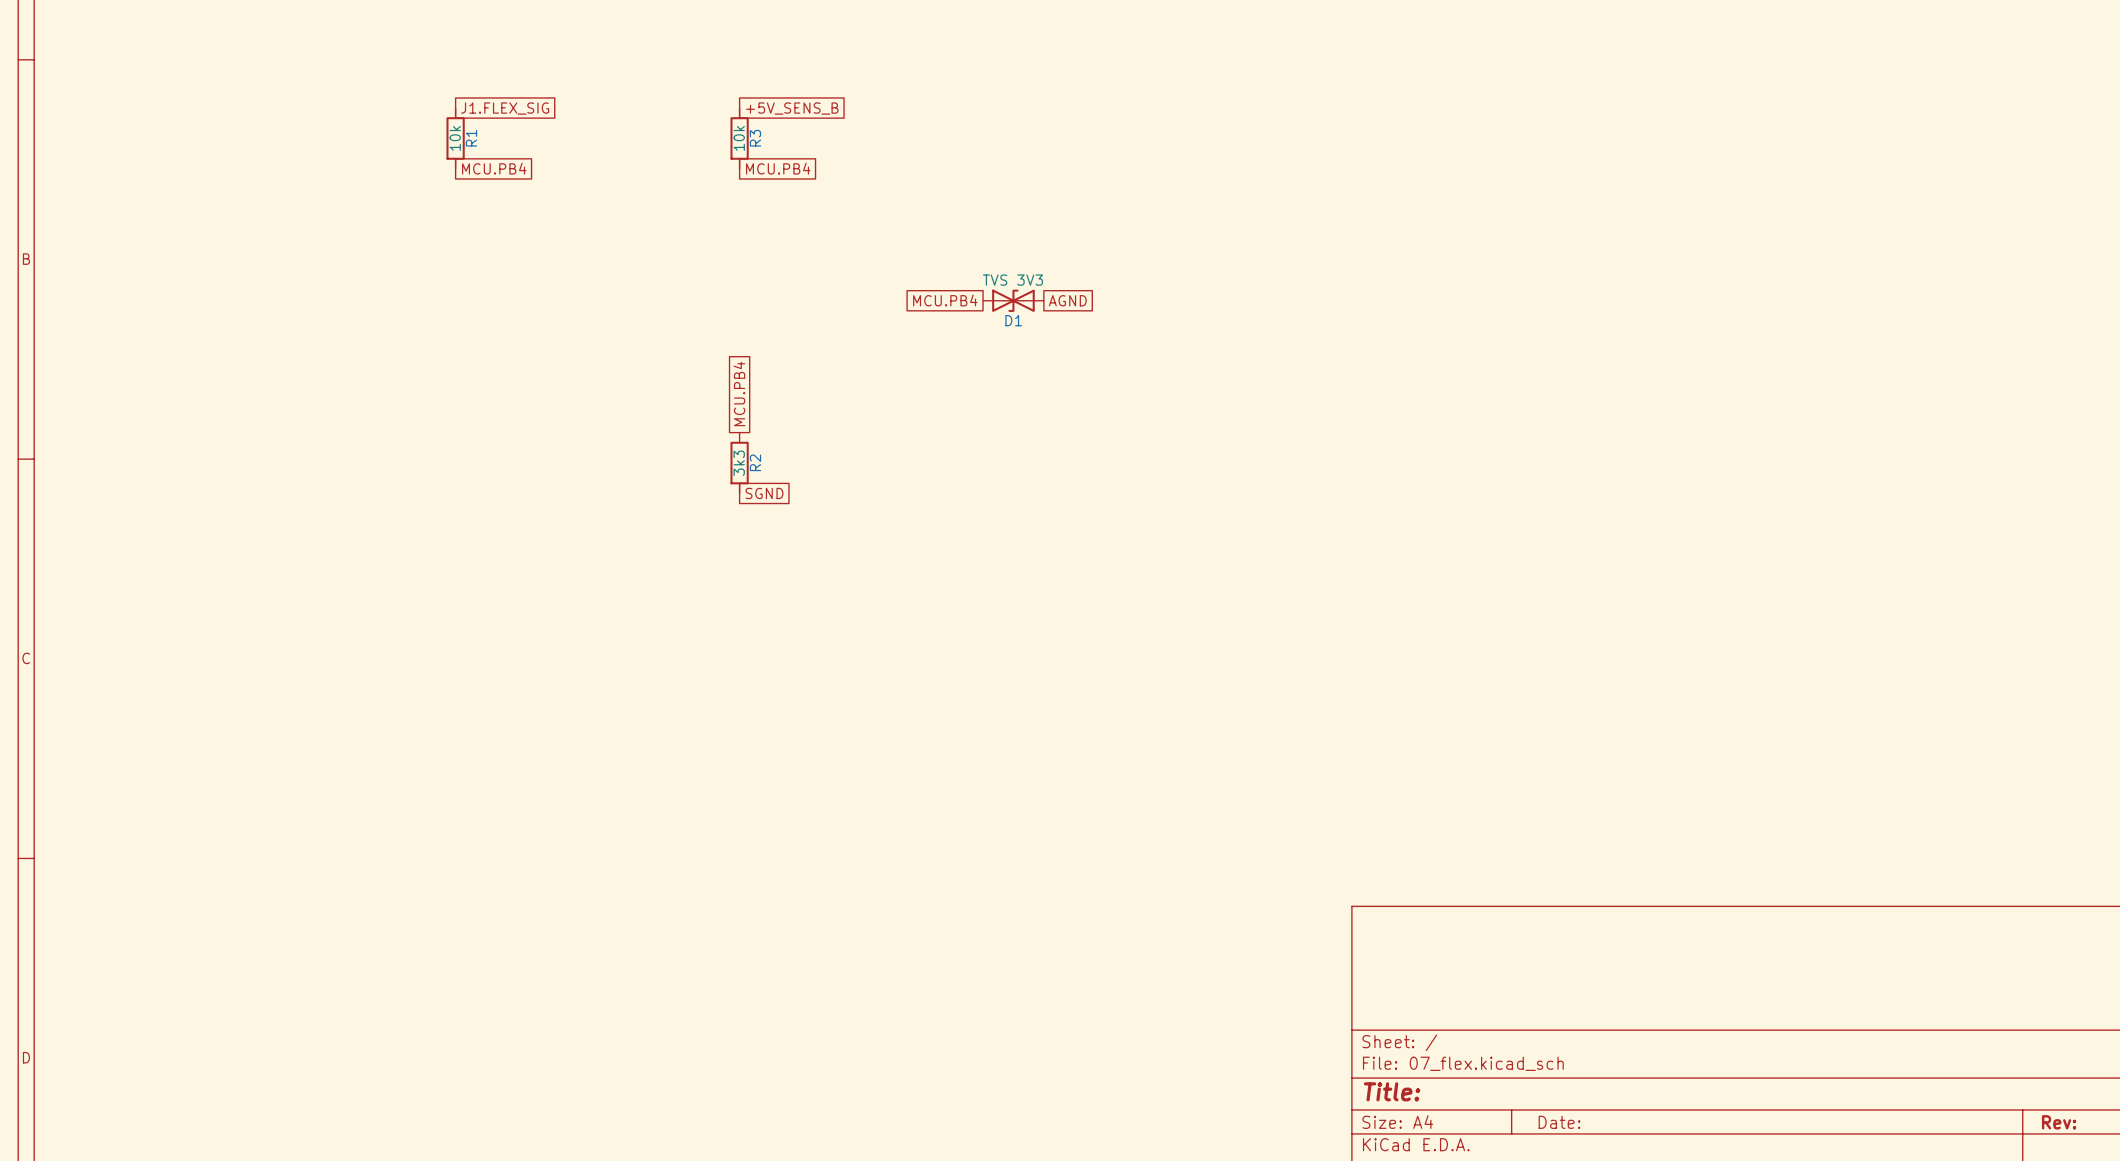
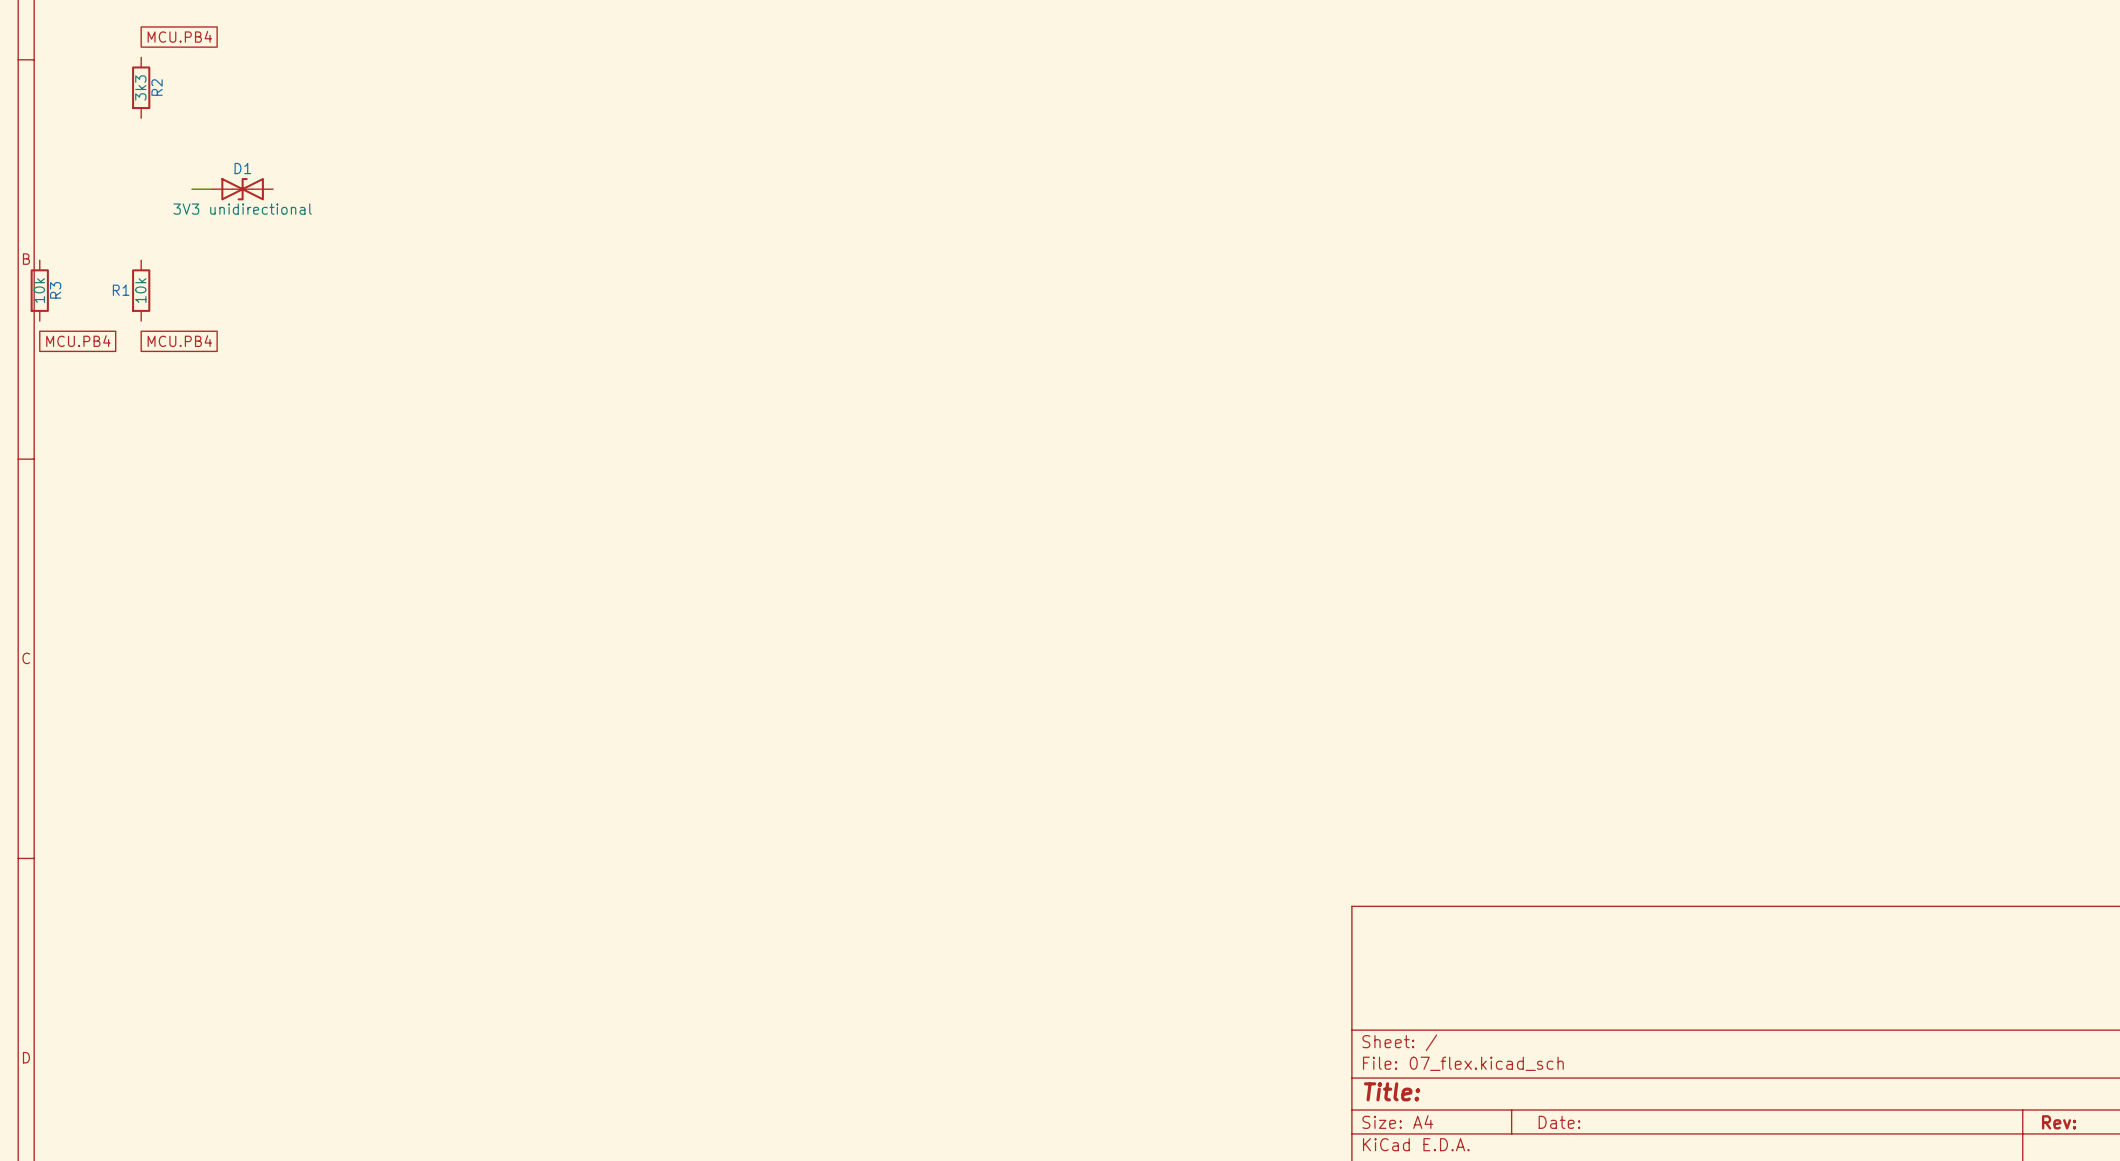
global label: none -> MCU.PB4 (179, 36)
global label: J1.FLEX_SIG (505, 108) -> none
global label: +5V_SENS_B (792, 108) -> none
R1 position: (455, 138) -> (141, 290)
R1 name rotation: 0° (471, 138) -> 90° clockwise (121, 290)
R1 name position: R1 (471, 138) -> R1 (121, 290)
R3 position: (739, 138) -> (39, 290)
global label: MCU.PB4 (494, 168) -> none
global label: MCU.PB4 (778, 168) -> none
wire: none -> (191, 189) (212, 189)
D1 value: TVS 3V3 (1012, 280) -> 3V3 unidirectional (242, 209)
global label: MCU.PB4 (945, 300) -> none
D1 position: (1013, 300) -> (242, 189)
global label: AGND (1067, 300) -> none
D1 name position: D1 (1013, 320) -> D1 (242, 168)
global label: none -> MCU.PB4 (78, 341)
global label: none -> MCU.PB4 (179, 341)
global label: MCU.PB4 (739, 393) -> none
R2 position: (739, 463) -> (141, 87)
global label: SGND (764, 493) -> none

